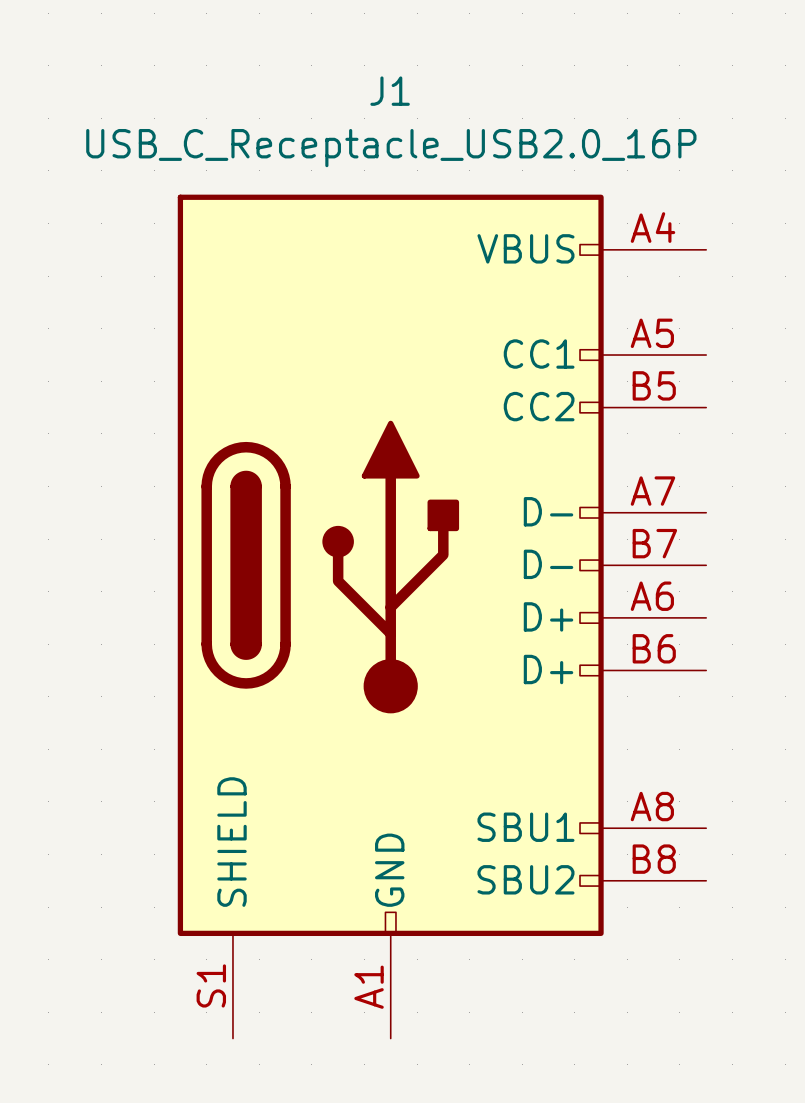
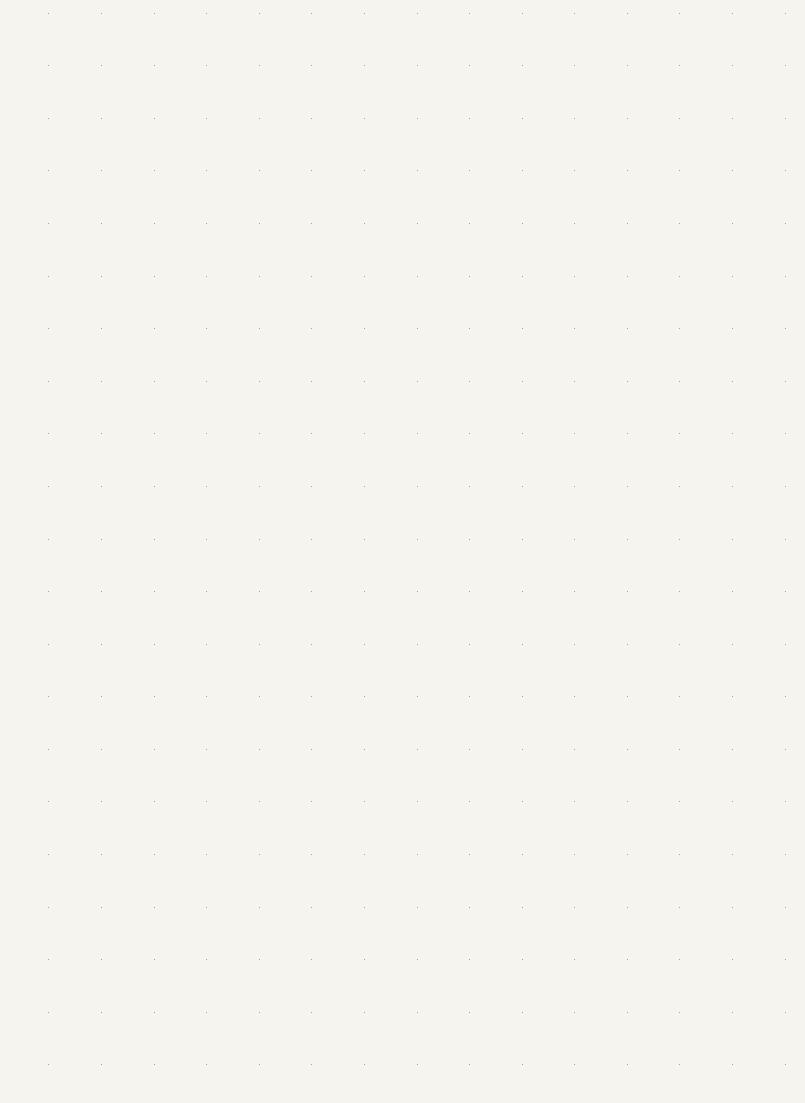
J1: USB_C_Receptacle_USB2.0_16P (441, 616) -> none

